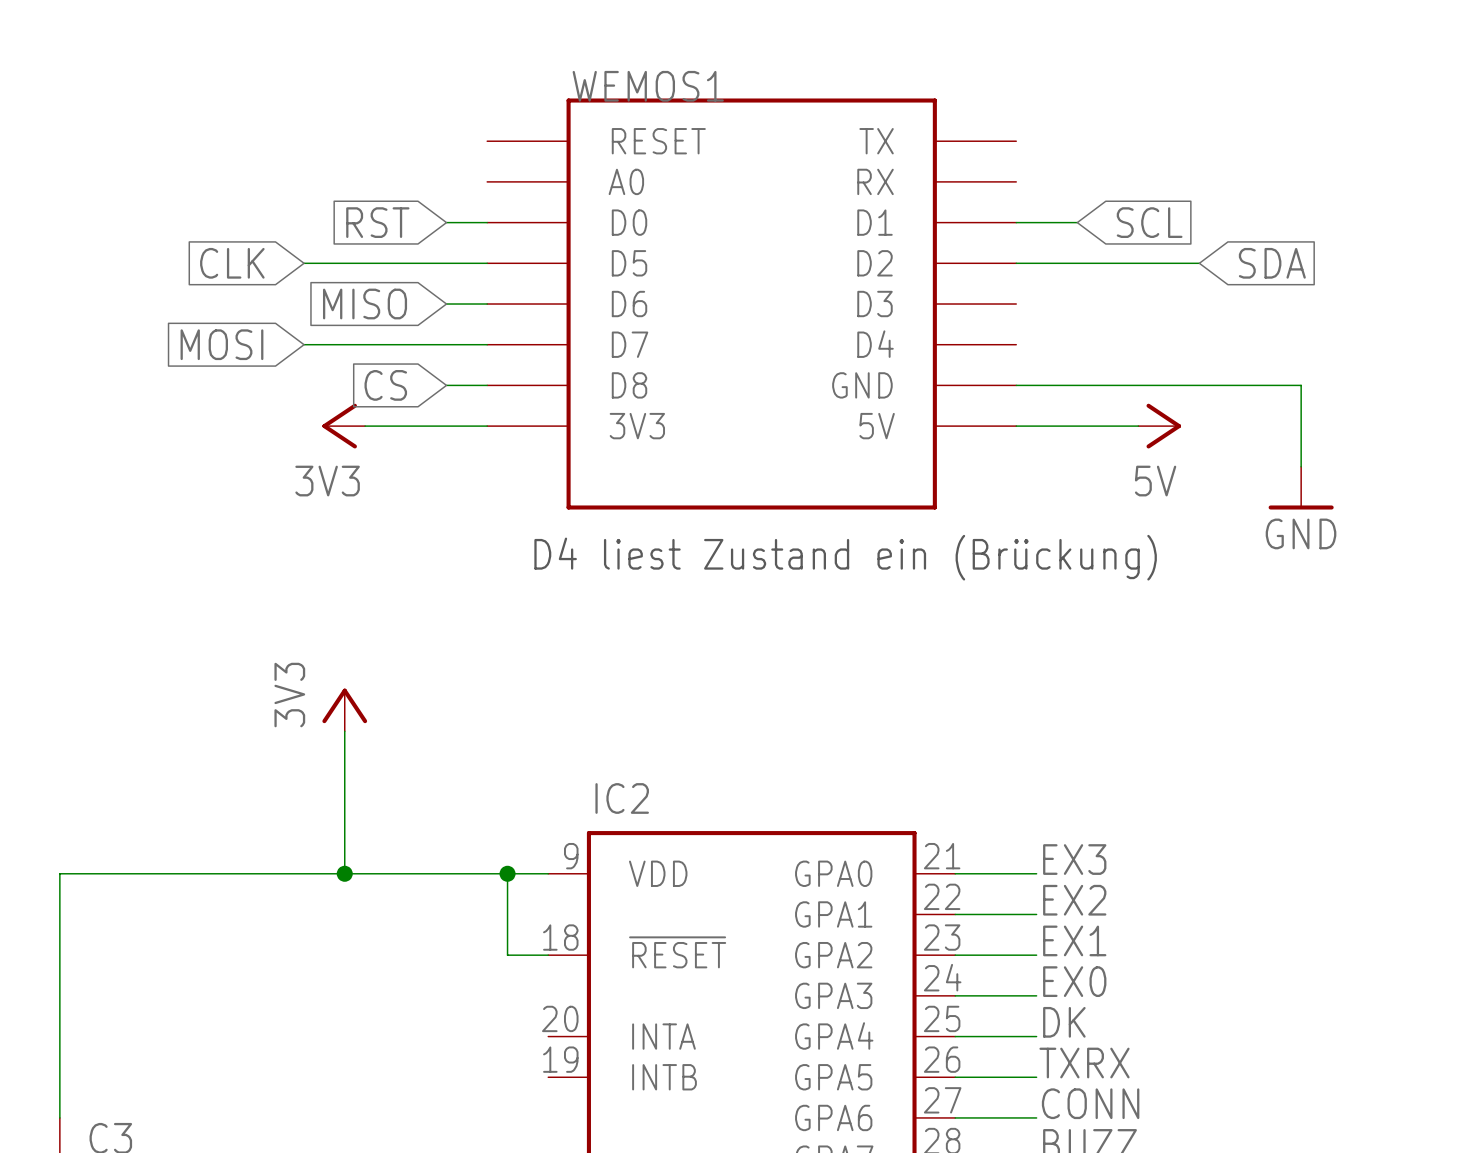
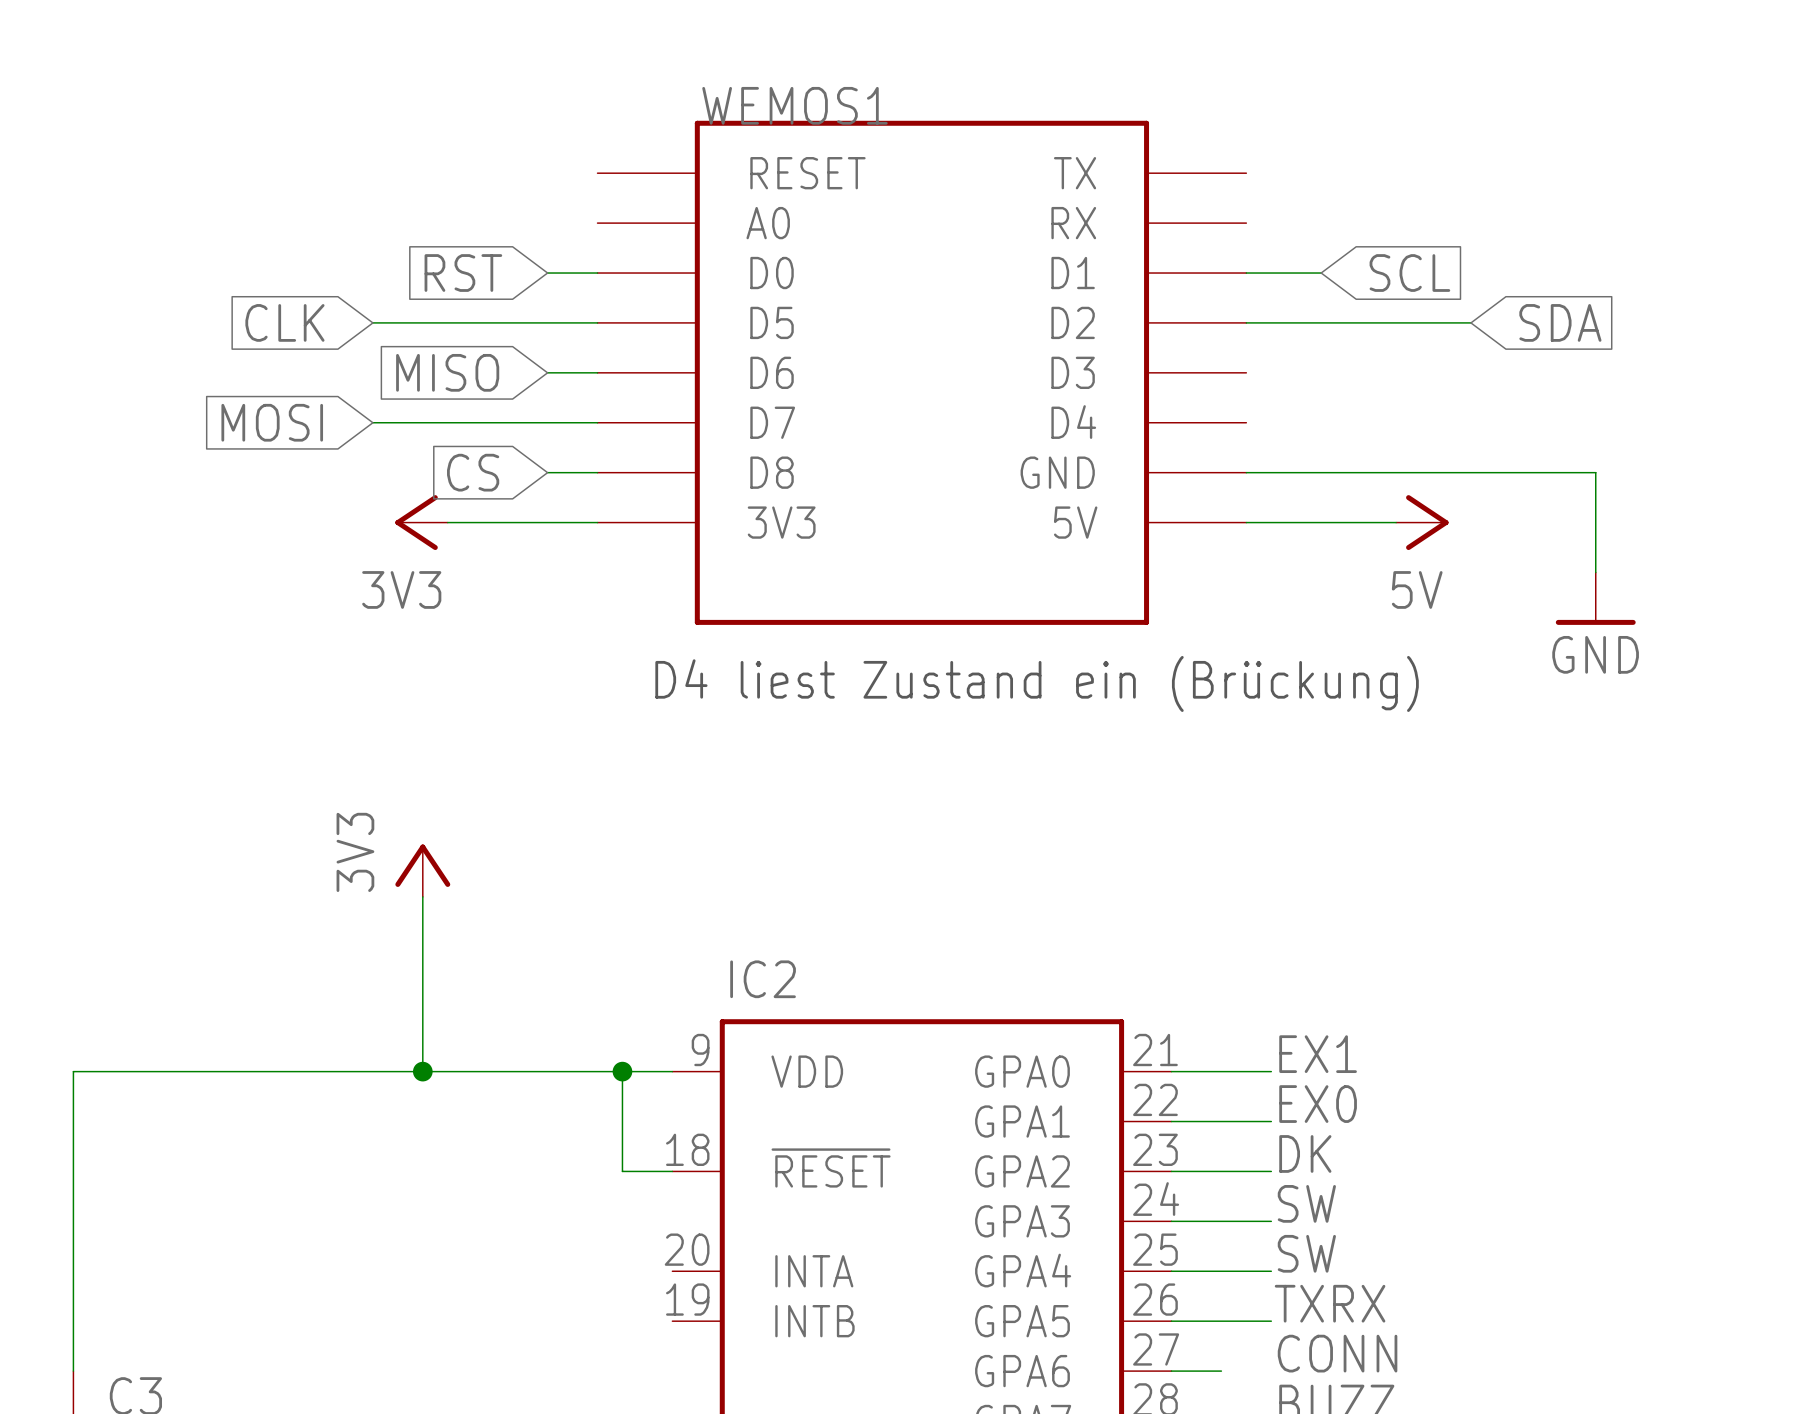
label: EX3 (1074, 859) -> EX1 (1318, 1054)
label: EX2 (1074, 900) -> EX0 (1318, 1104)
label: EX1 (1074, 940) -> DK (1305, 1153)
label: EX0 (1074, 981) -> SW (1306, 1203)
label: DK (1064, 1022) -> SW (1306, 1253)
wire: (995, 1117) (1036, 1117) -> none

